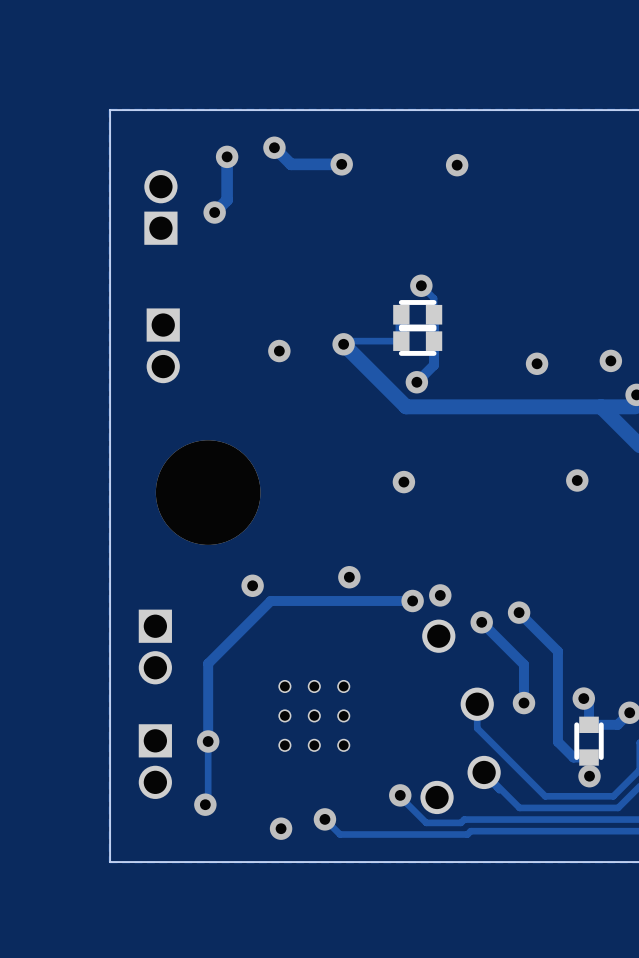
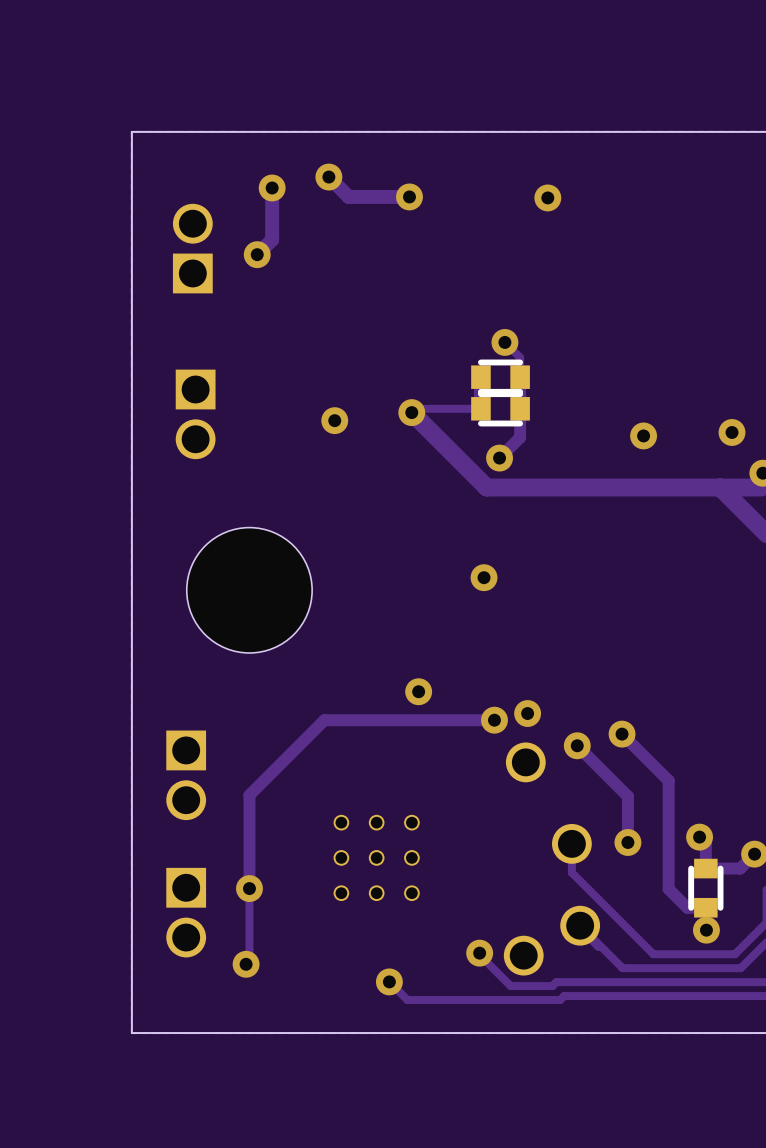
part footprint: [155, 440, 261, 545] -> [186, 527, 313, 653]
via: (577, 480) -> none
via: (252, 585) -> none
via: (281, 828) -> none

